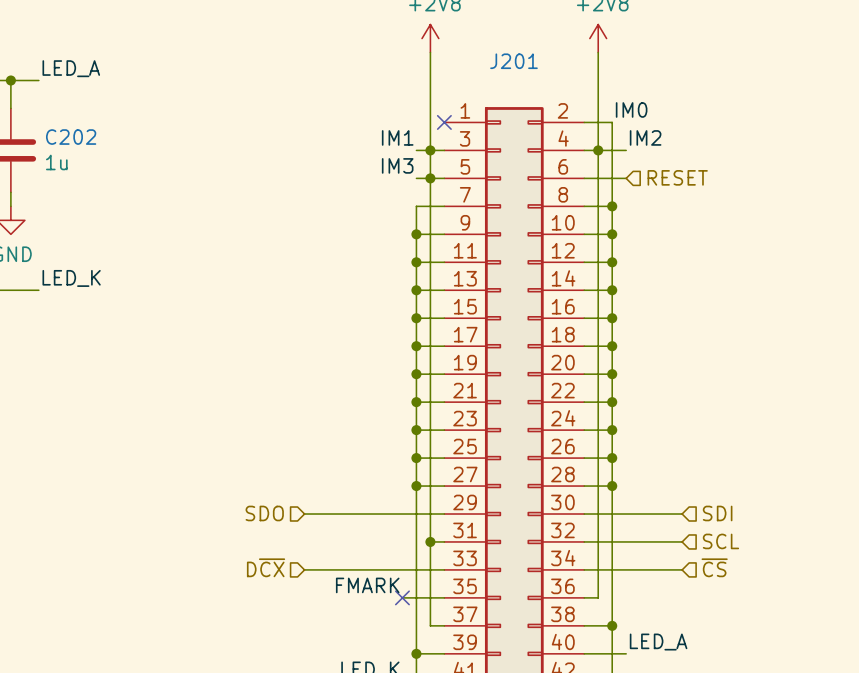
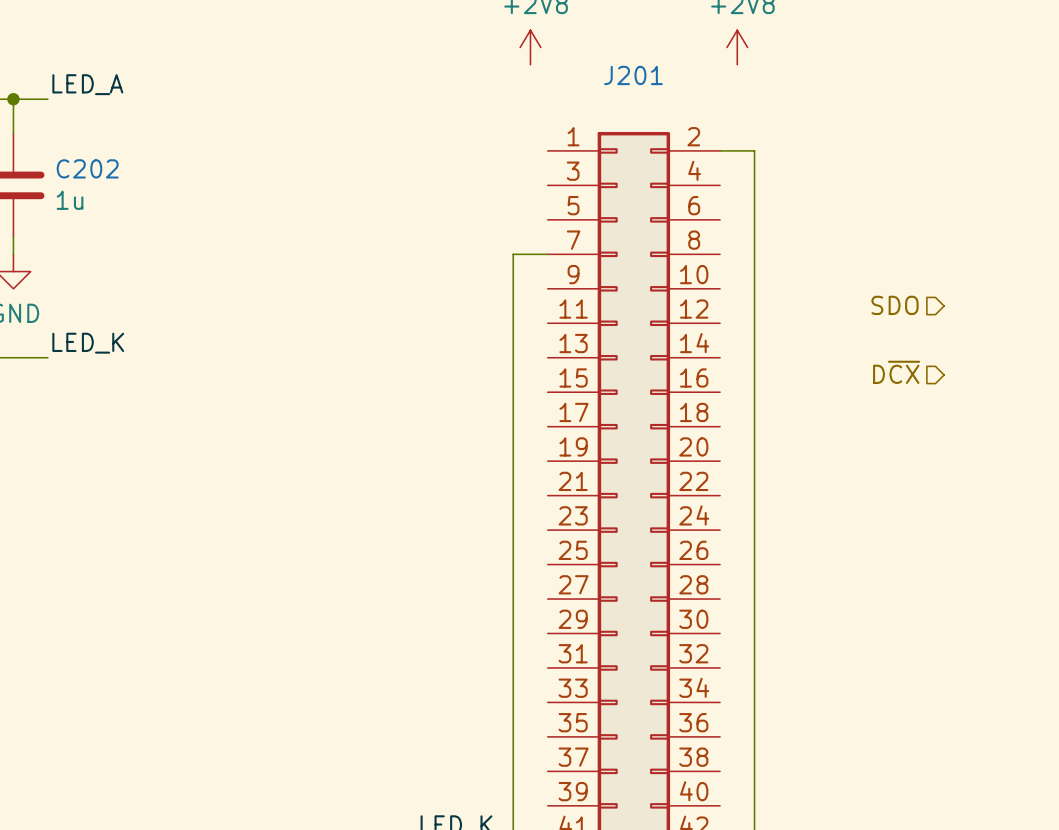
wire: (430, 52) (430, 625) (444, 625) -> none
wire: (598, 52) (598, 597) (584, 597) -> none
label: IM0 (631, 109) -> none
no-connect mark: (444, 122) -> none
label: IM1 (397, 137) -> none
label: IM2 (645, 137) -> none
wire: (416, 150) (444, 150) -> none
junction: (430, 150) -> none
wire: (584, 150) (626, 150) -> none
junction: (598, 150) -> none
label: IM3 (397, 165) -> none
hierarchical label: RESET (677, 177) -> none
wire: (416, 178) (444, 178) -> none
junction: (430, 178) -> none
wire: (584, 178) (626, 178) -> none
wire: (584, 206) (612, 206) -> none
junction: (612, 206) -> none
wire: (416, 234) (444, 234) -> none
junction: (416, 234) -> none
wire: (584, 234) (612, 234) -> none
junction: (612, 234) -> none
hierarchical label: none -> SDO (895, 305)
wire: (416, 262) (444, 262) -> none
junction: (416, 262) -> none
wire: (584, 262) (612, 262) -> none
junction: (612, 262) -> none
wire: (416, 290) (444, 290) -> none
junction: (416, 290) -> none
wire: (584, 290) (612, 290) -> none
junction: (612, 290) -> none
hierarchical label: none -> D~{CX} (896, 372)
wire: (416, 318) (444, 318) -> none
junction: (416, 318) -> none
wire: (584, 318) (612, 318) -> none
junction: (612, 318) -> none
wire: (416, 346) (444, 346) -> none
junction: (416, 346) -> none
wire: (584, 346) (612, 346) -> none
junction: (612, 346) -> none
wire: (416, 374) (444, 374) -> none
junction: (416, 374) -> none
wire: (584, 374) (612, 374) -> none
junction: (612, 374) -> none
wire: (416, 402) (444, 402) -> none
junction: (416, 402) -> none
wire: (584, 402) (612, 402) -> none
junction: (612, 402) -> none
wire: (416, 430) (444, 430) -> none
junction: (416, 430) -> none
wire: (584, 430) (612, 430) -> none
junction: (612, 430) -> none
wire: (416, 458) (444, 458) -> none
junction: (416, 458) -> none
wire: (584, 458) (612, 458) -> none
junction: (612, 458) -> none
wire: (416, 486) (444, 486) -> none
junction: (416, 486) -> none
wire: (584, 486) (612, 486) -> none
junction: (612, 486) -> none
hierarchical label: SDO (264, 513) -> none
hierarchical label: SDI (717, 513) -> none
wire: (304, 514) (444, 514) -> none
wire: (584, 514) (682, 514) -> none
wire: (430, 541) (444, 541) -> none
junction: (430, 541) -> none
wire: (584, 541) (682, 541) -> none
hierarchical label: SCL (720, 541) -> none
hierarchical label: D~{CX} (266, 567) -> none
hierarchical label: ~{CS} (714, 567) -> none
wire: (304, 569) (444, 569) -> none
wire: (584, 569) (682, 569) -> none
label: FMARK (367, 585) -> none
wire: (402, 597) (444, 597) -> none
no-connect mark: (402, 597) -> none
wire: (584, 625) (612, 625) -> none
junction: (612, 625) -> none
label: LED_A (658, 642) -> none
wire: (416, 653) (444, 653) -> none
junction: (416, 653) -> none
wire: (584, 653) (626, 653) -> none

